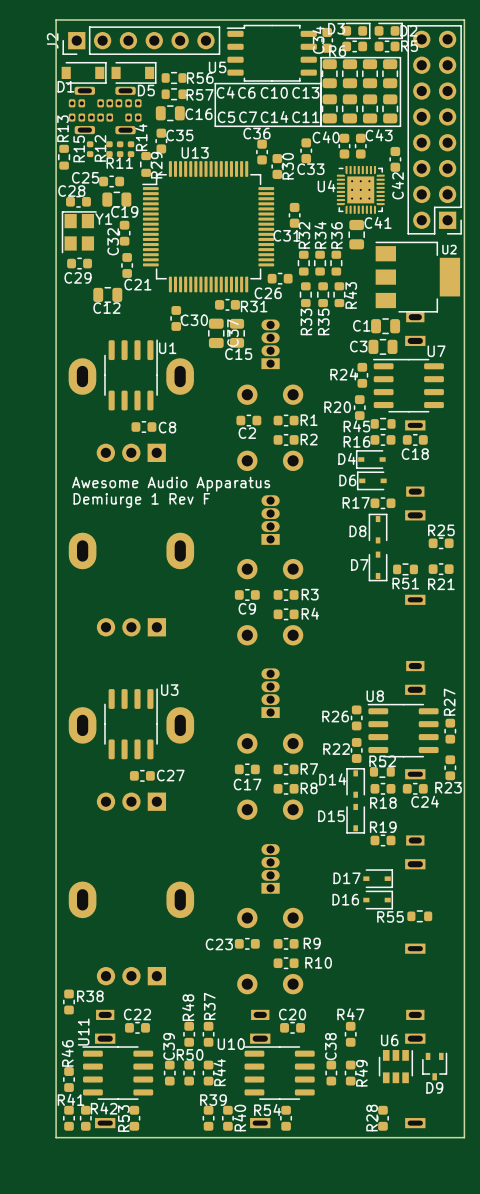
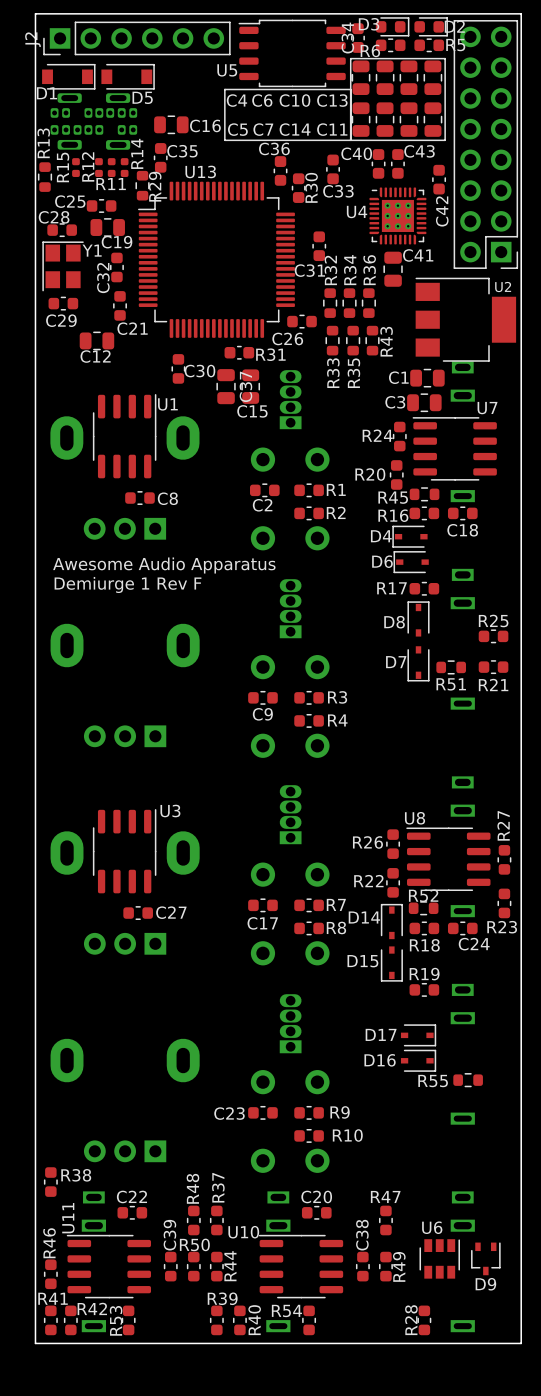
R56: (174, 77) -> none
R57: (174, 94) -> none

